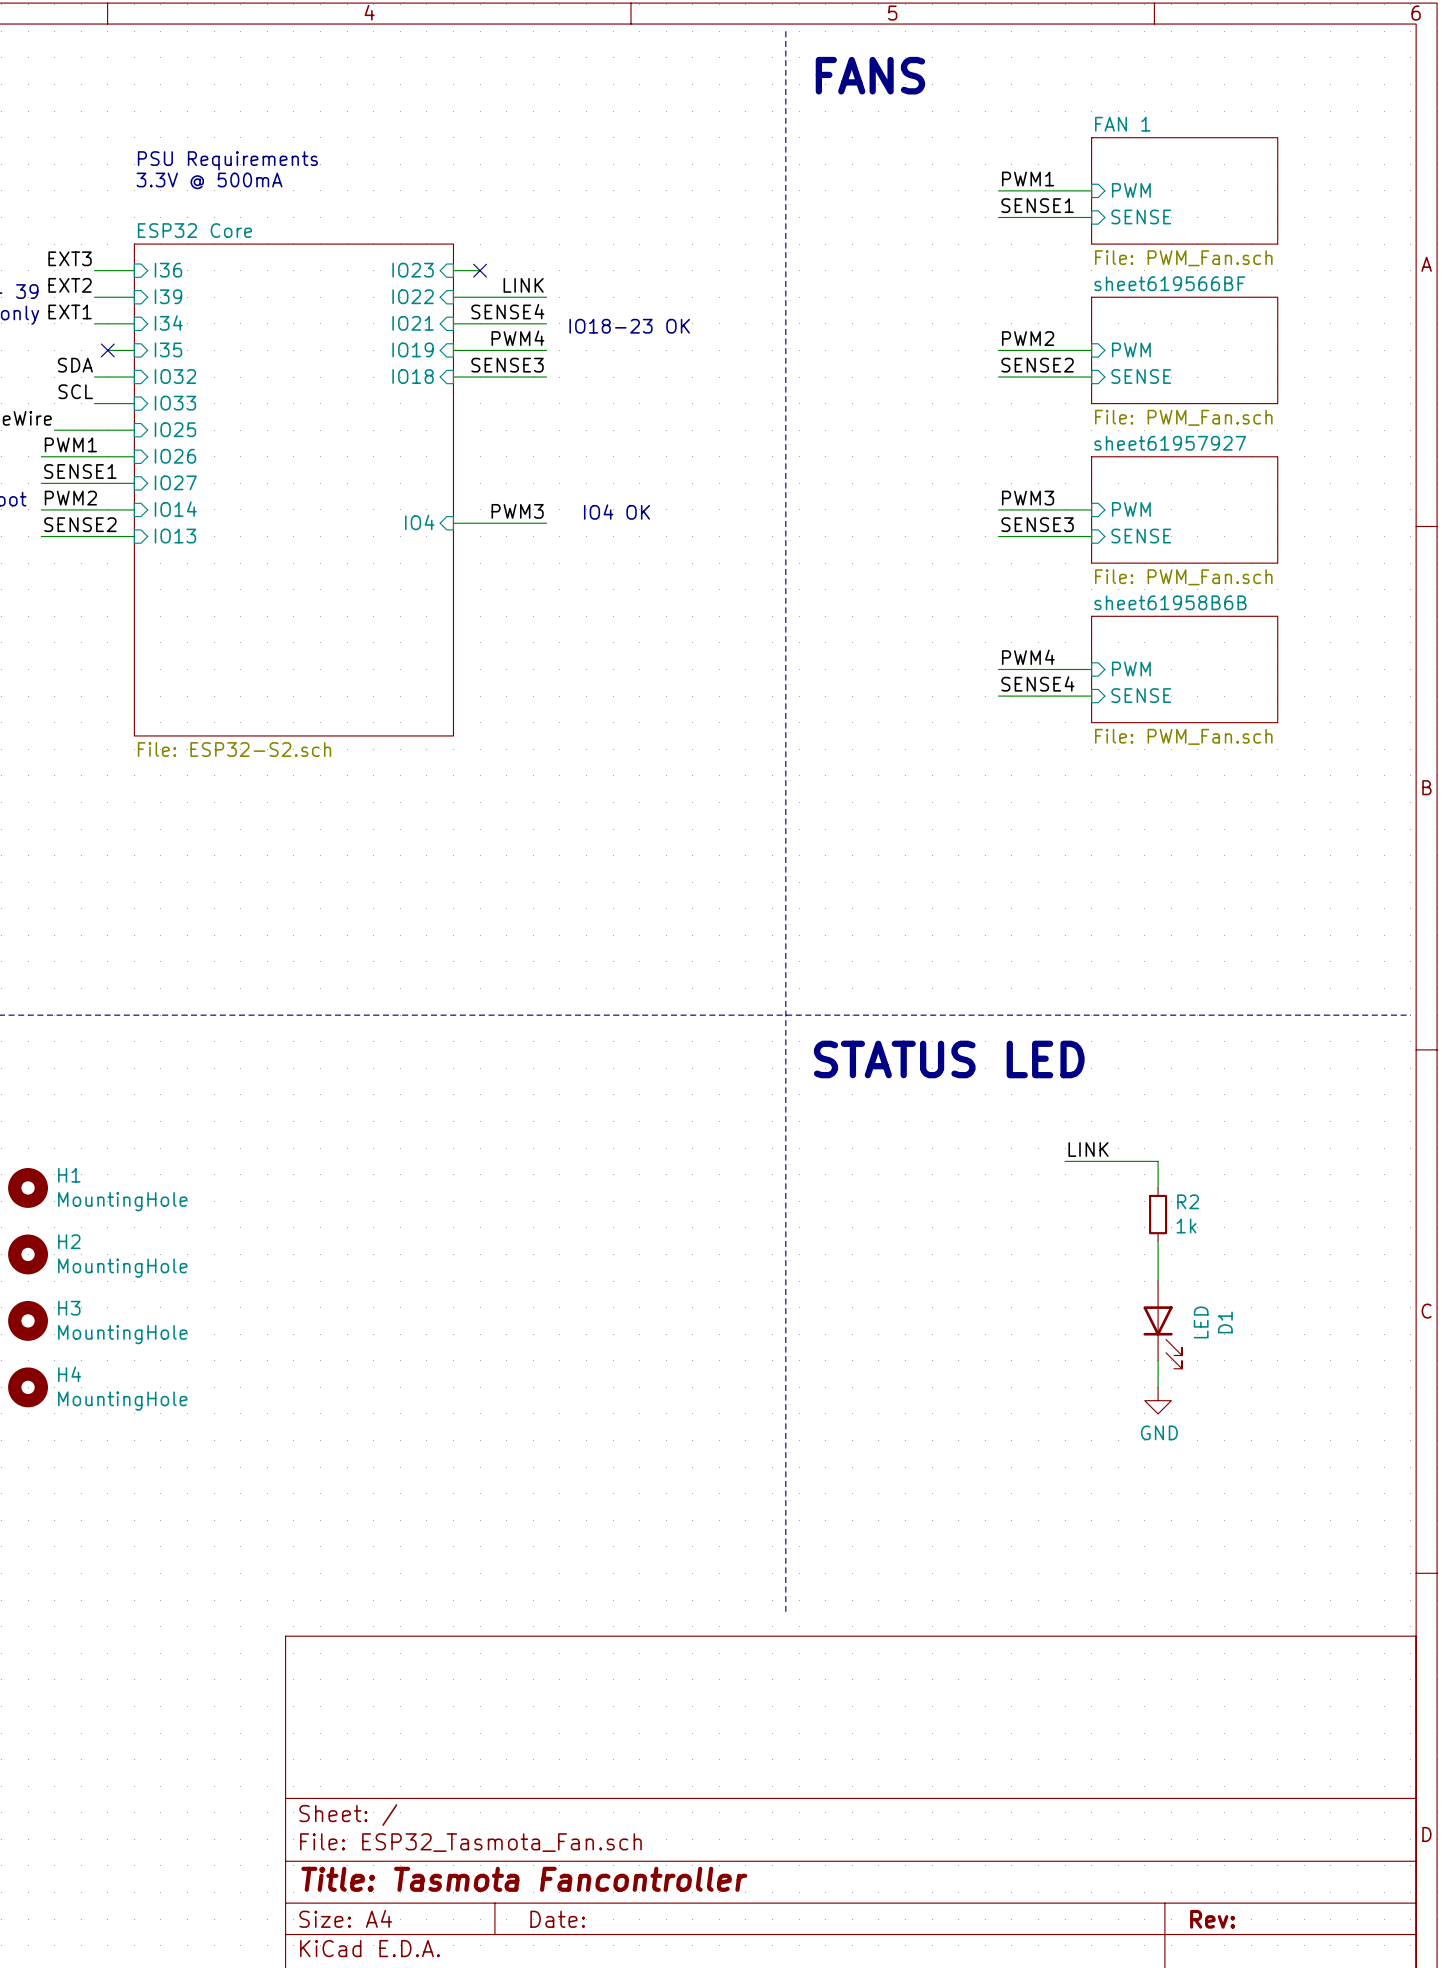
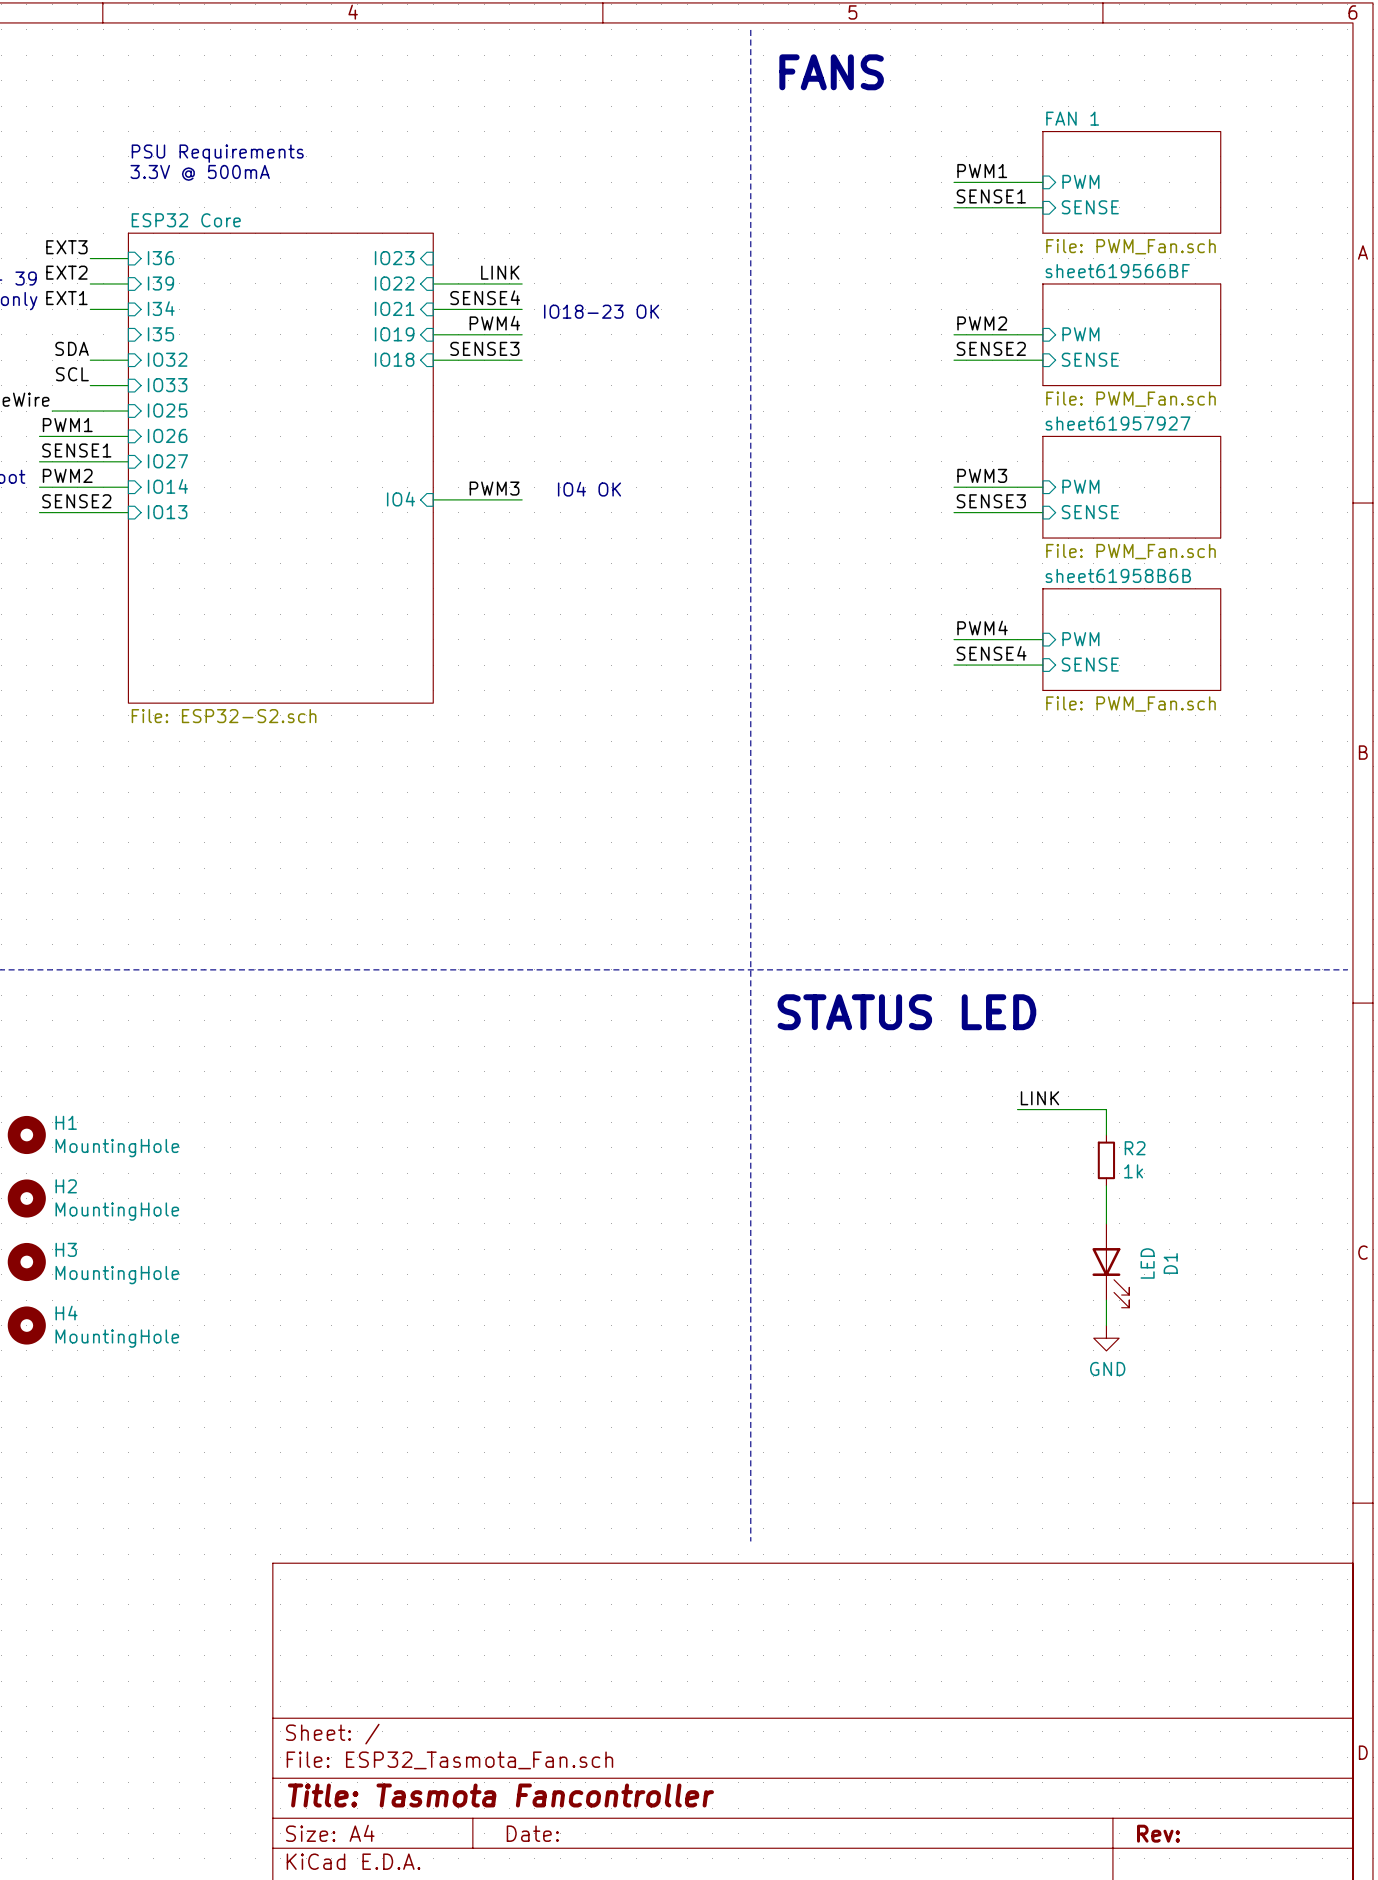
wire: (453, 270) (480, 270) -> none
no-connect mark: (480, 270) -> none
wire: (107, 350) (134, 350) -> none
no-connect mark: (107, 350) -> none

